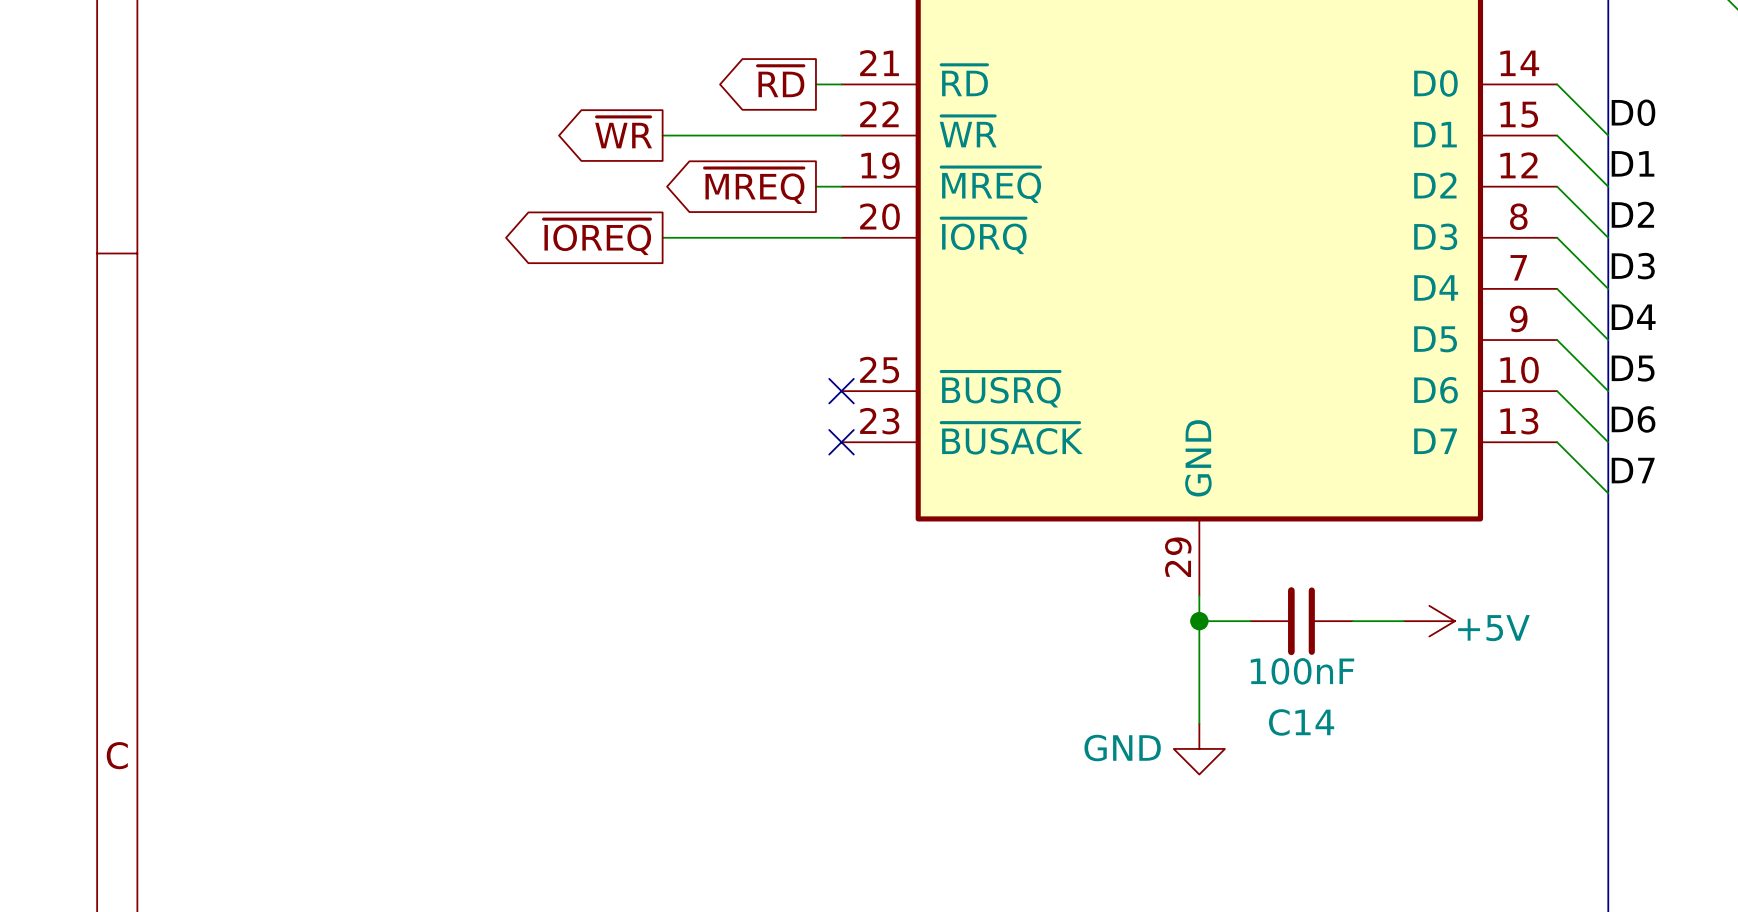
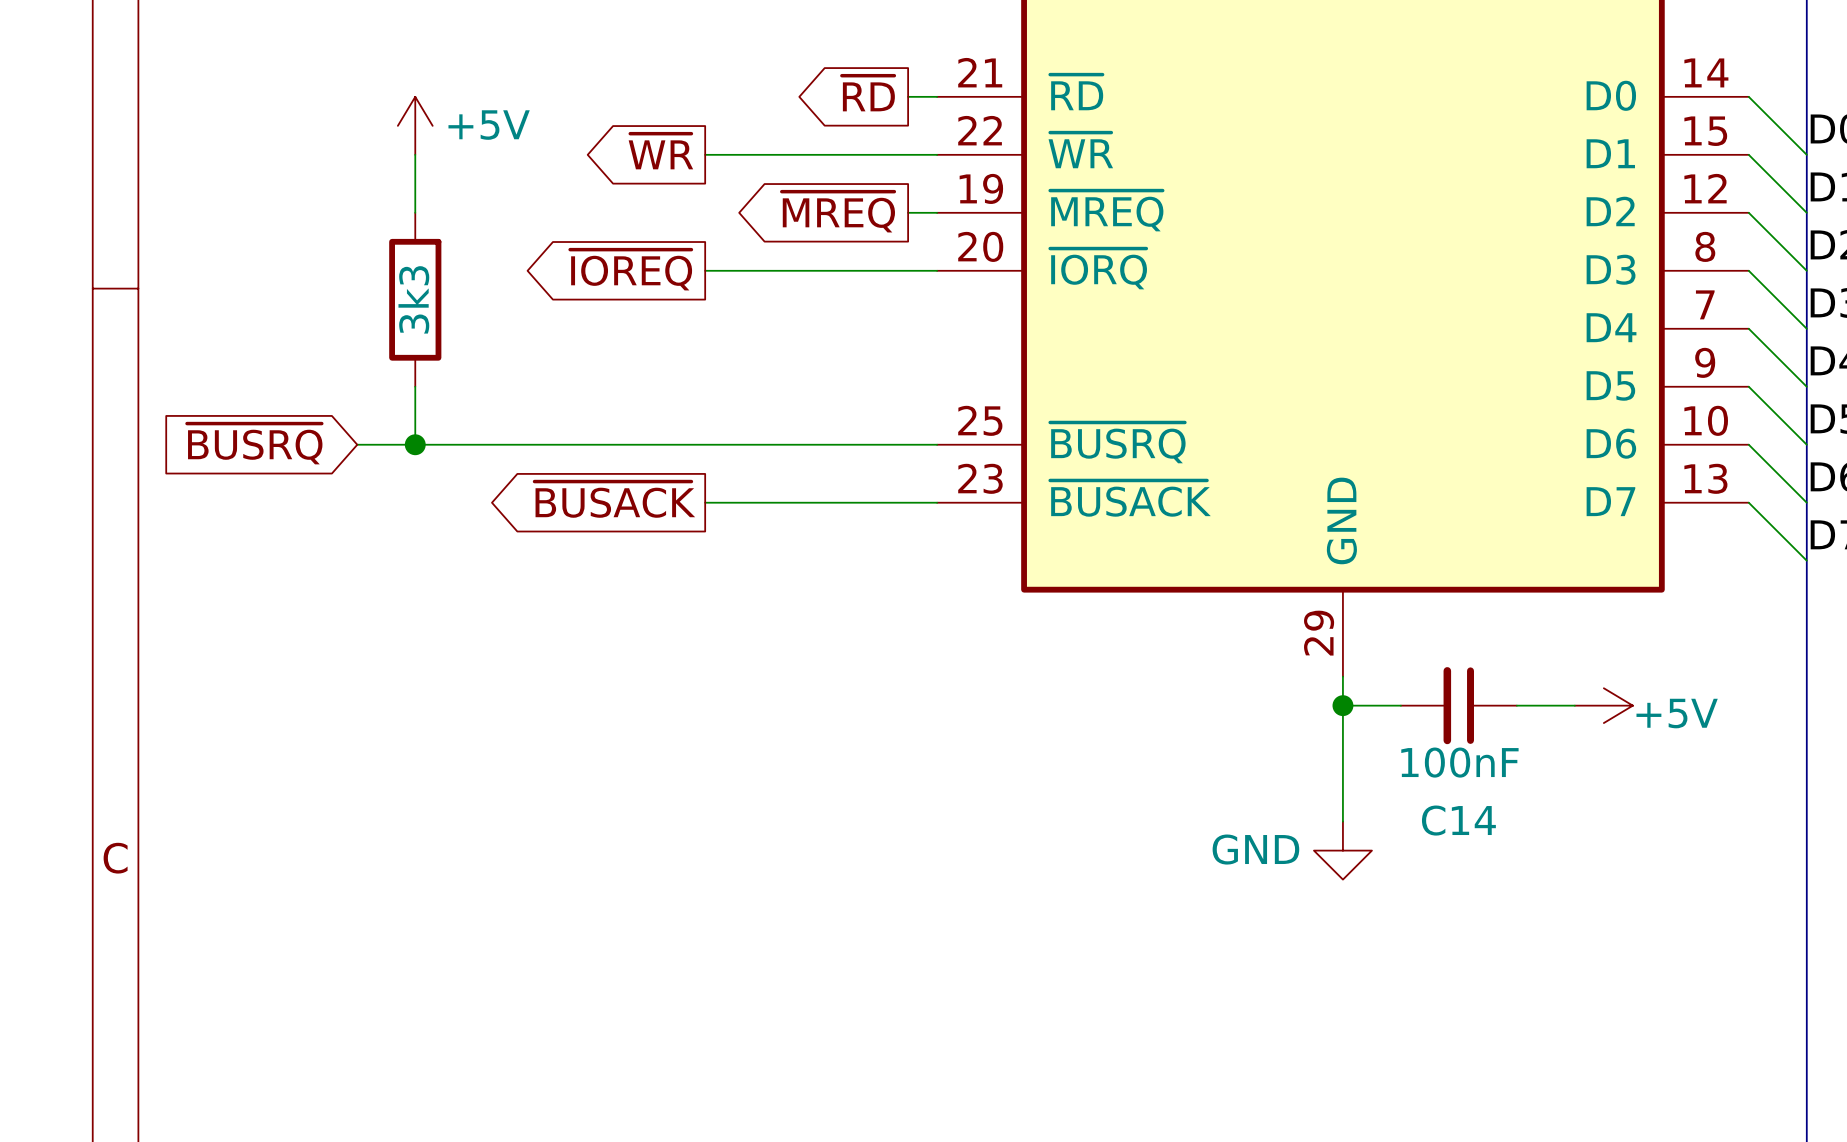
power symbol: none -> +5V (415, 125)
global label position: ~{WR} (623, 132) -> ~{WR} (660, 151)
wire: none -> (415, 154) (415, 212)
wire: none -> (705, 154) (734, 154)
global label position: ~{IOREQ} (597, 237) -> ~{IOREQ} (631, 270)
wire: none -> (705, 270) (734, 270)
part: none -> 3k3 (415, 299)
wire: none -> (415, 386) (415, 444)
global label: none -> ~{BUSRQ} (254, 443)
wire: none -> (357, 444) (937, 444)
junction: none -> (415, 444)
no-connect mark: (841, 391) -> none
global label: none -> ~{BUSACK} (614, 499)
wire: none -> (705, 502) (937, 502)
no-connect mark: (841, 442) -> none

